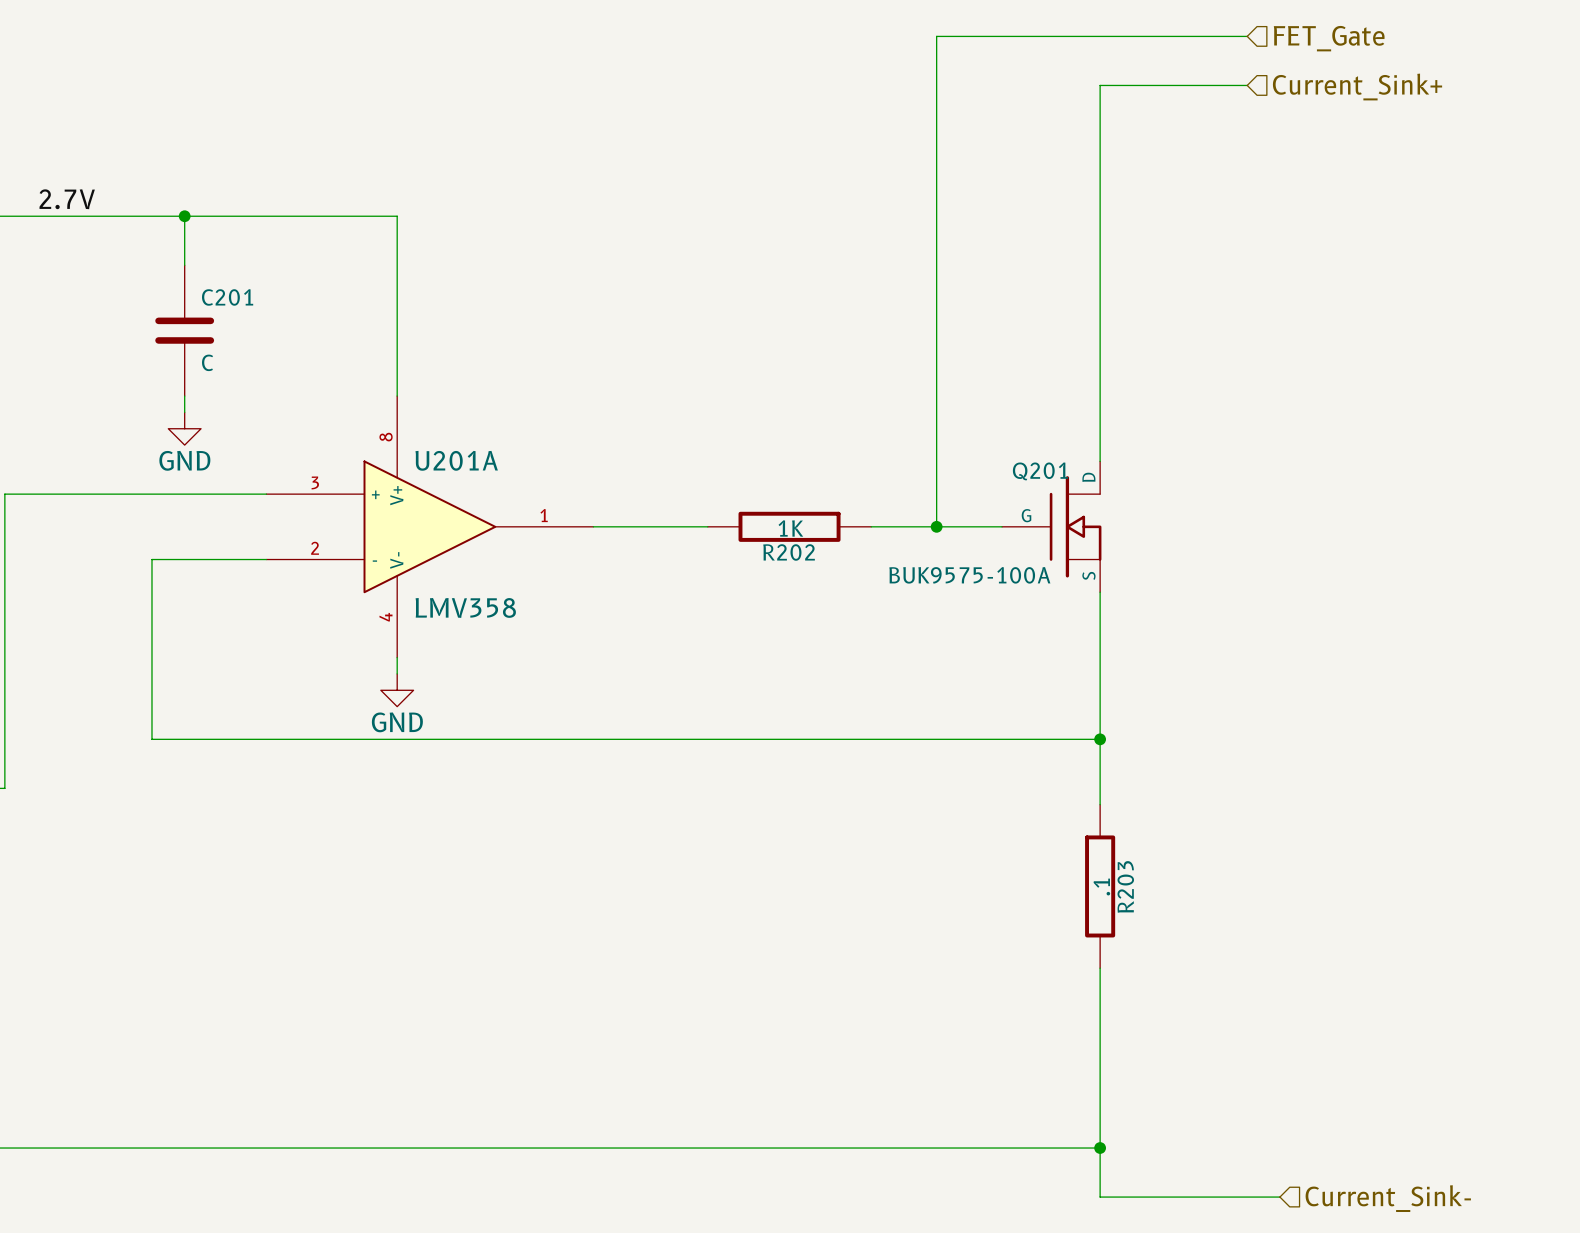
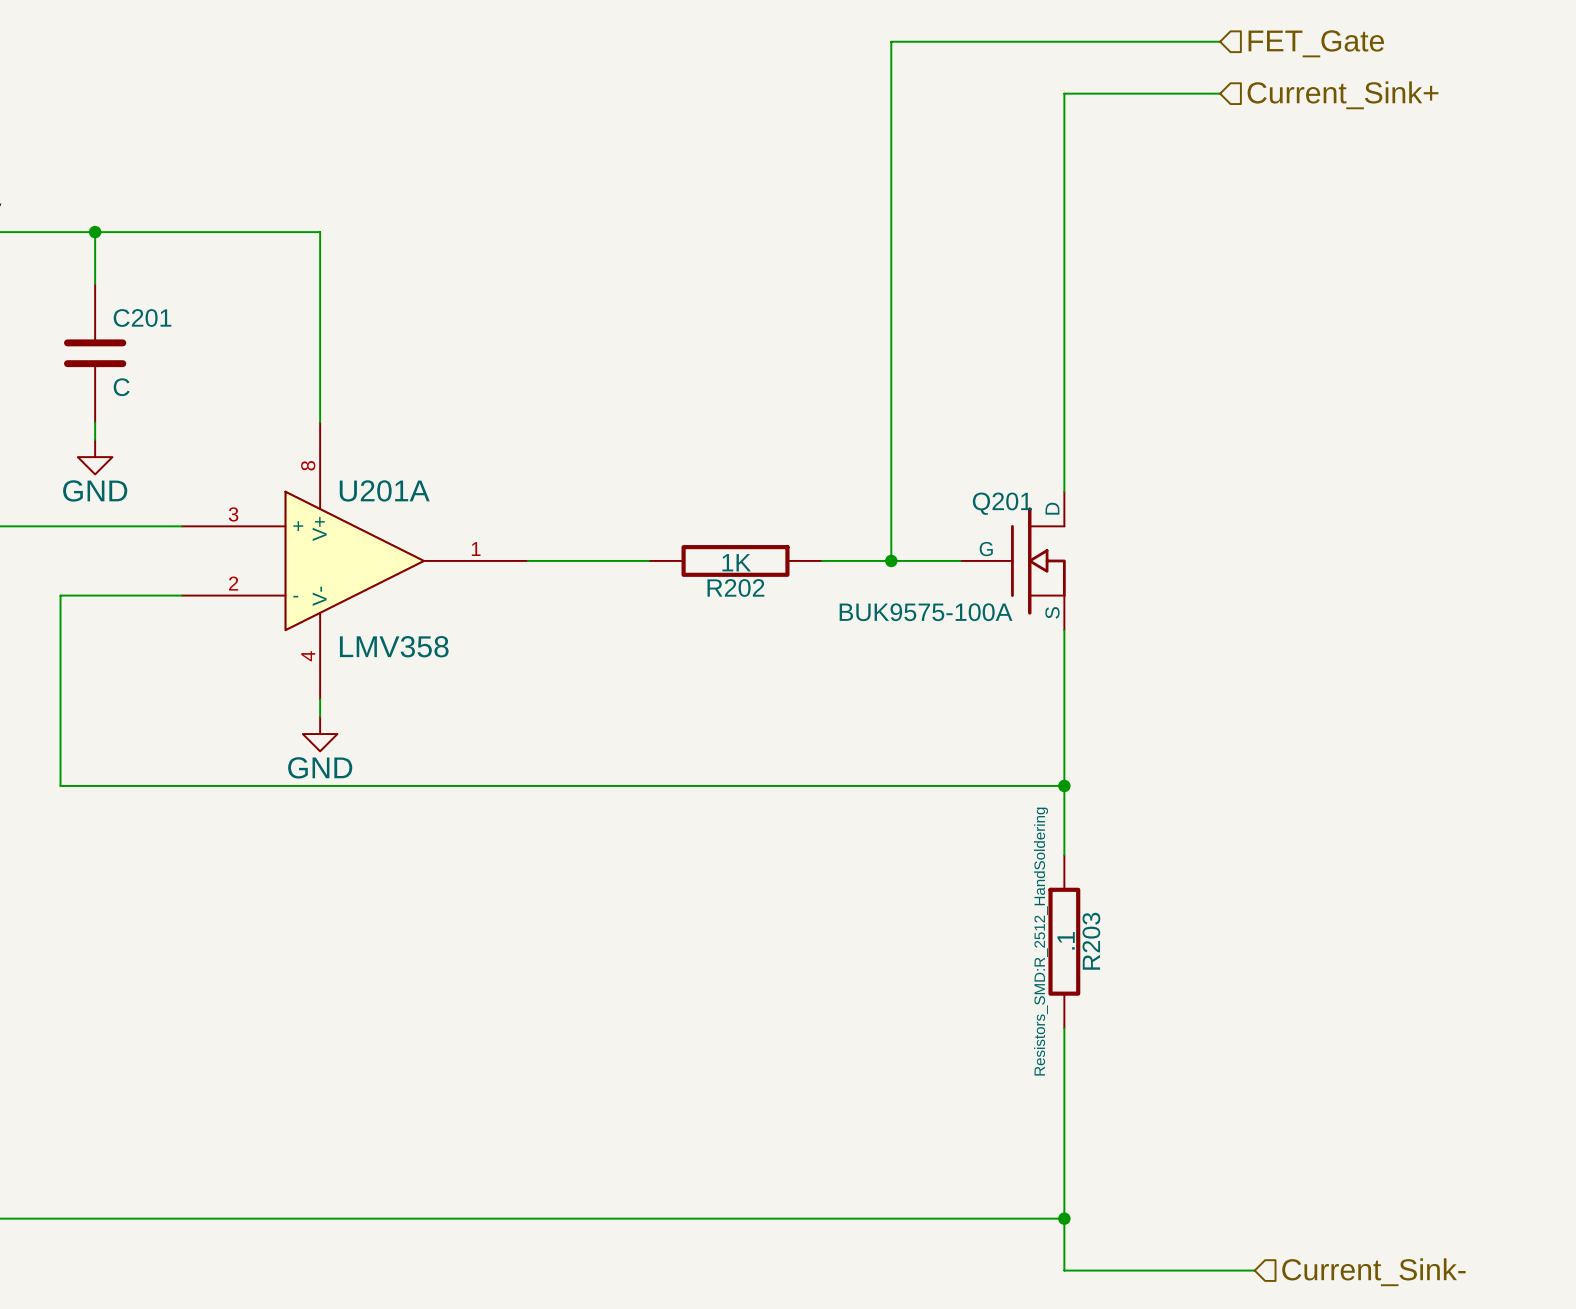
R203 text: none -> Resistors_SMD:R_2512_HandSoldering (1041, 941)

